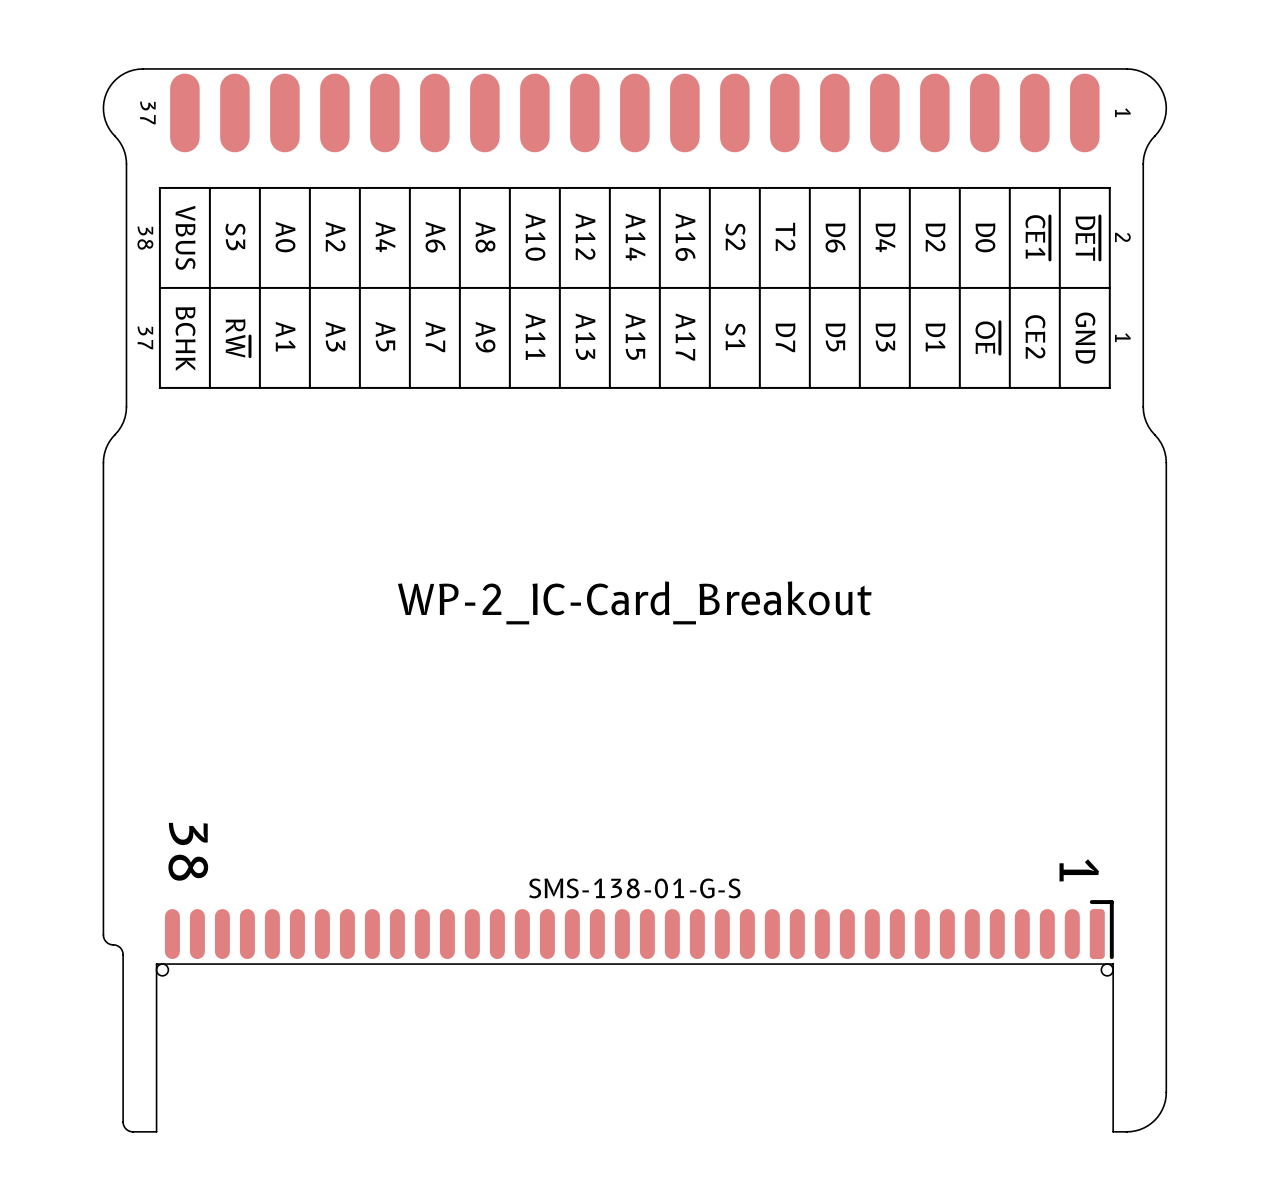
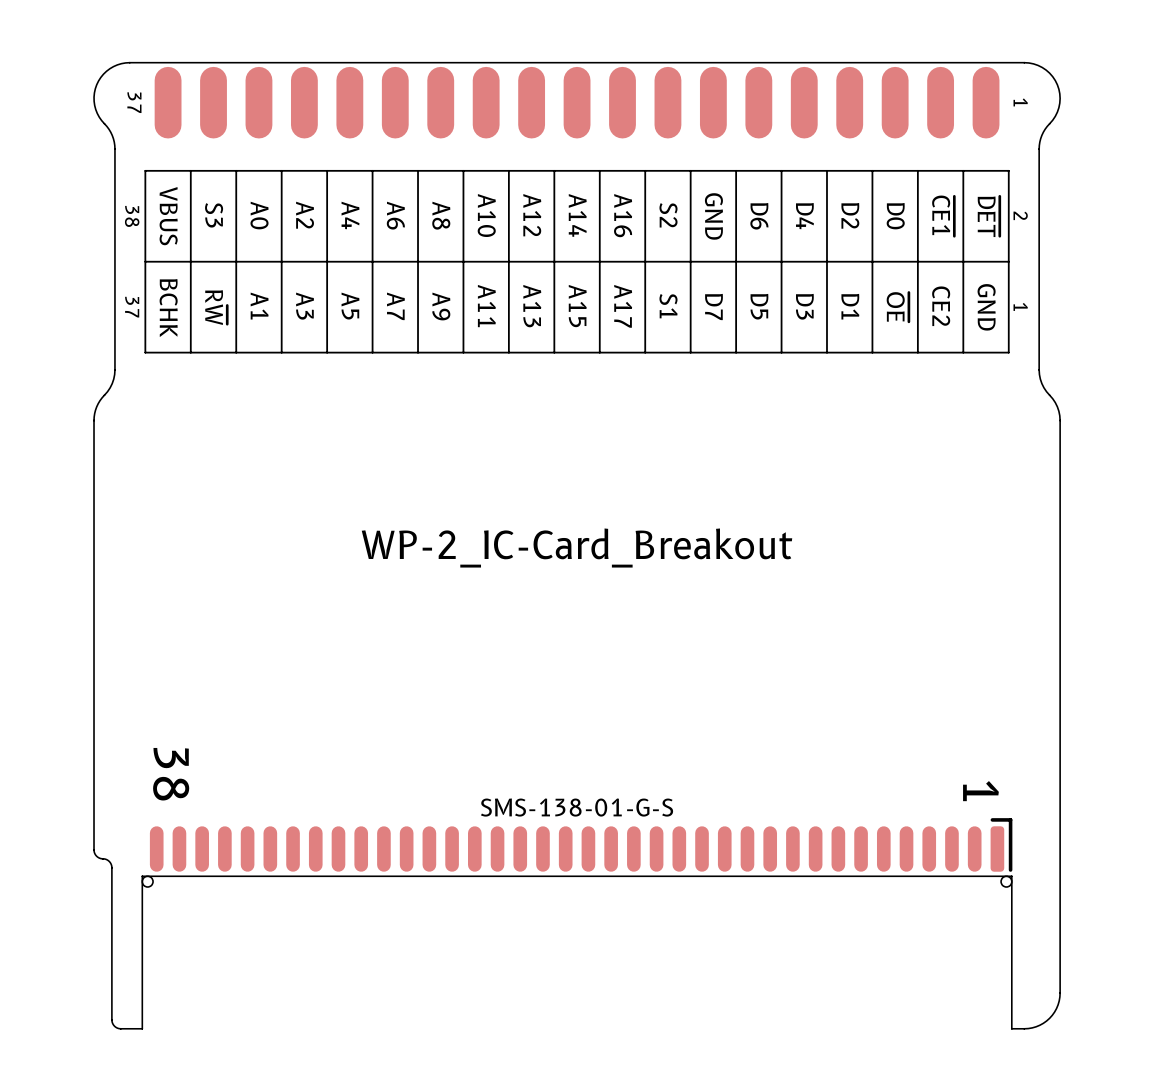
text: T2 (785, 236) -> GND (713, 216)

